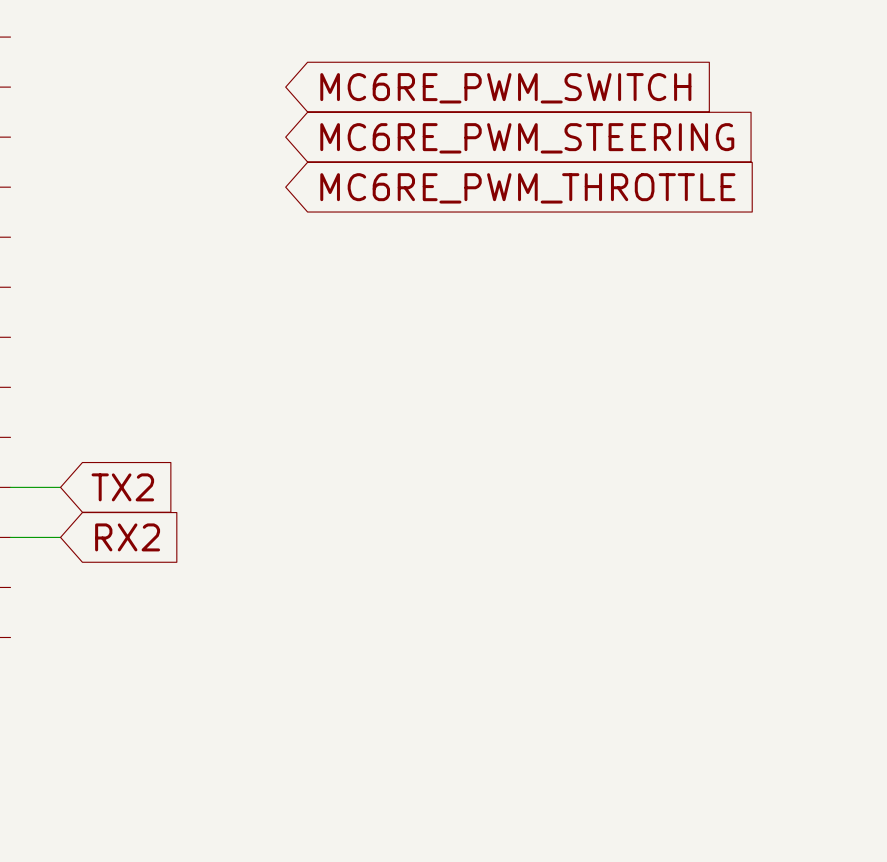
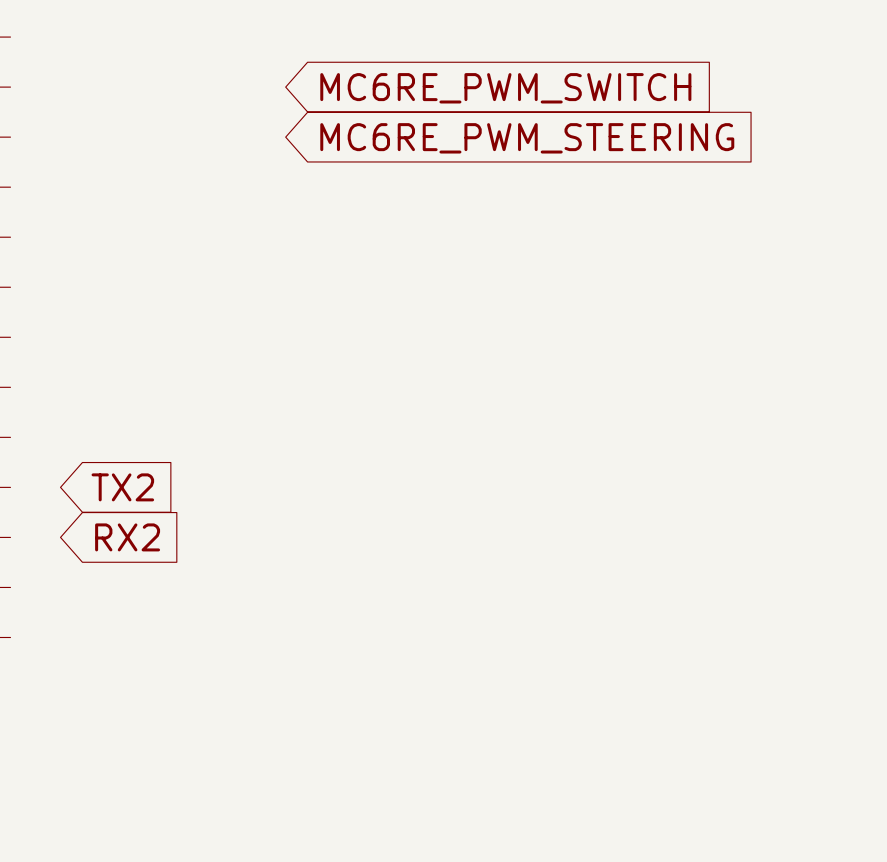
global label: MC6RE_PWM_THROTTLE (527, 188) -> none
wire: (10, 487) (60, 487) -> none
wire: (10, 537) (60, 537) -> none

